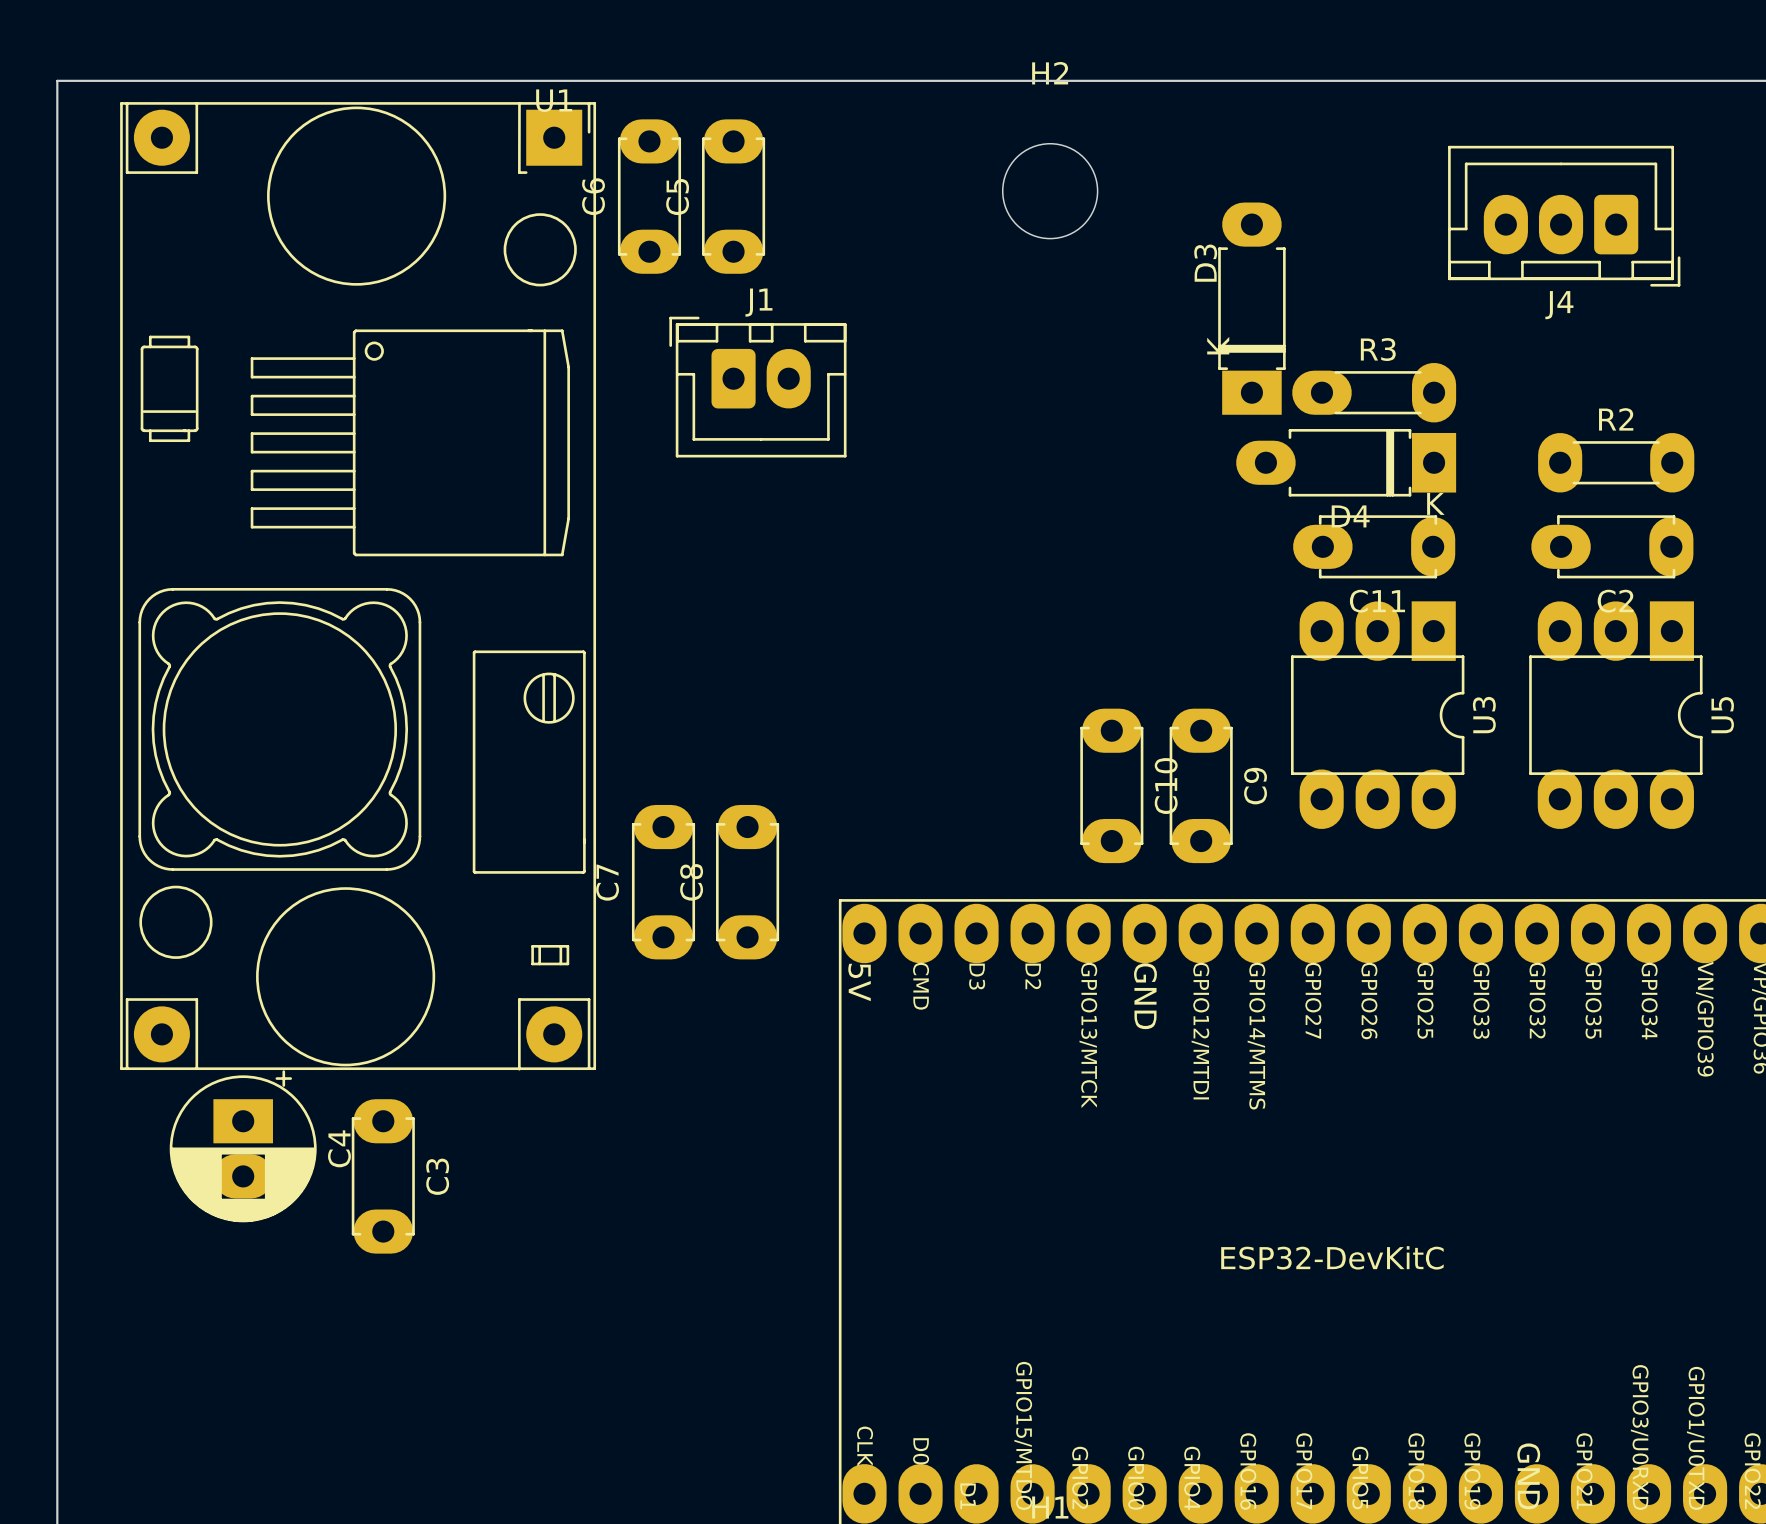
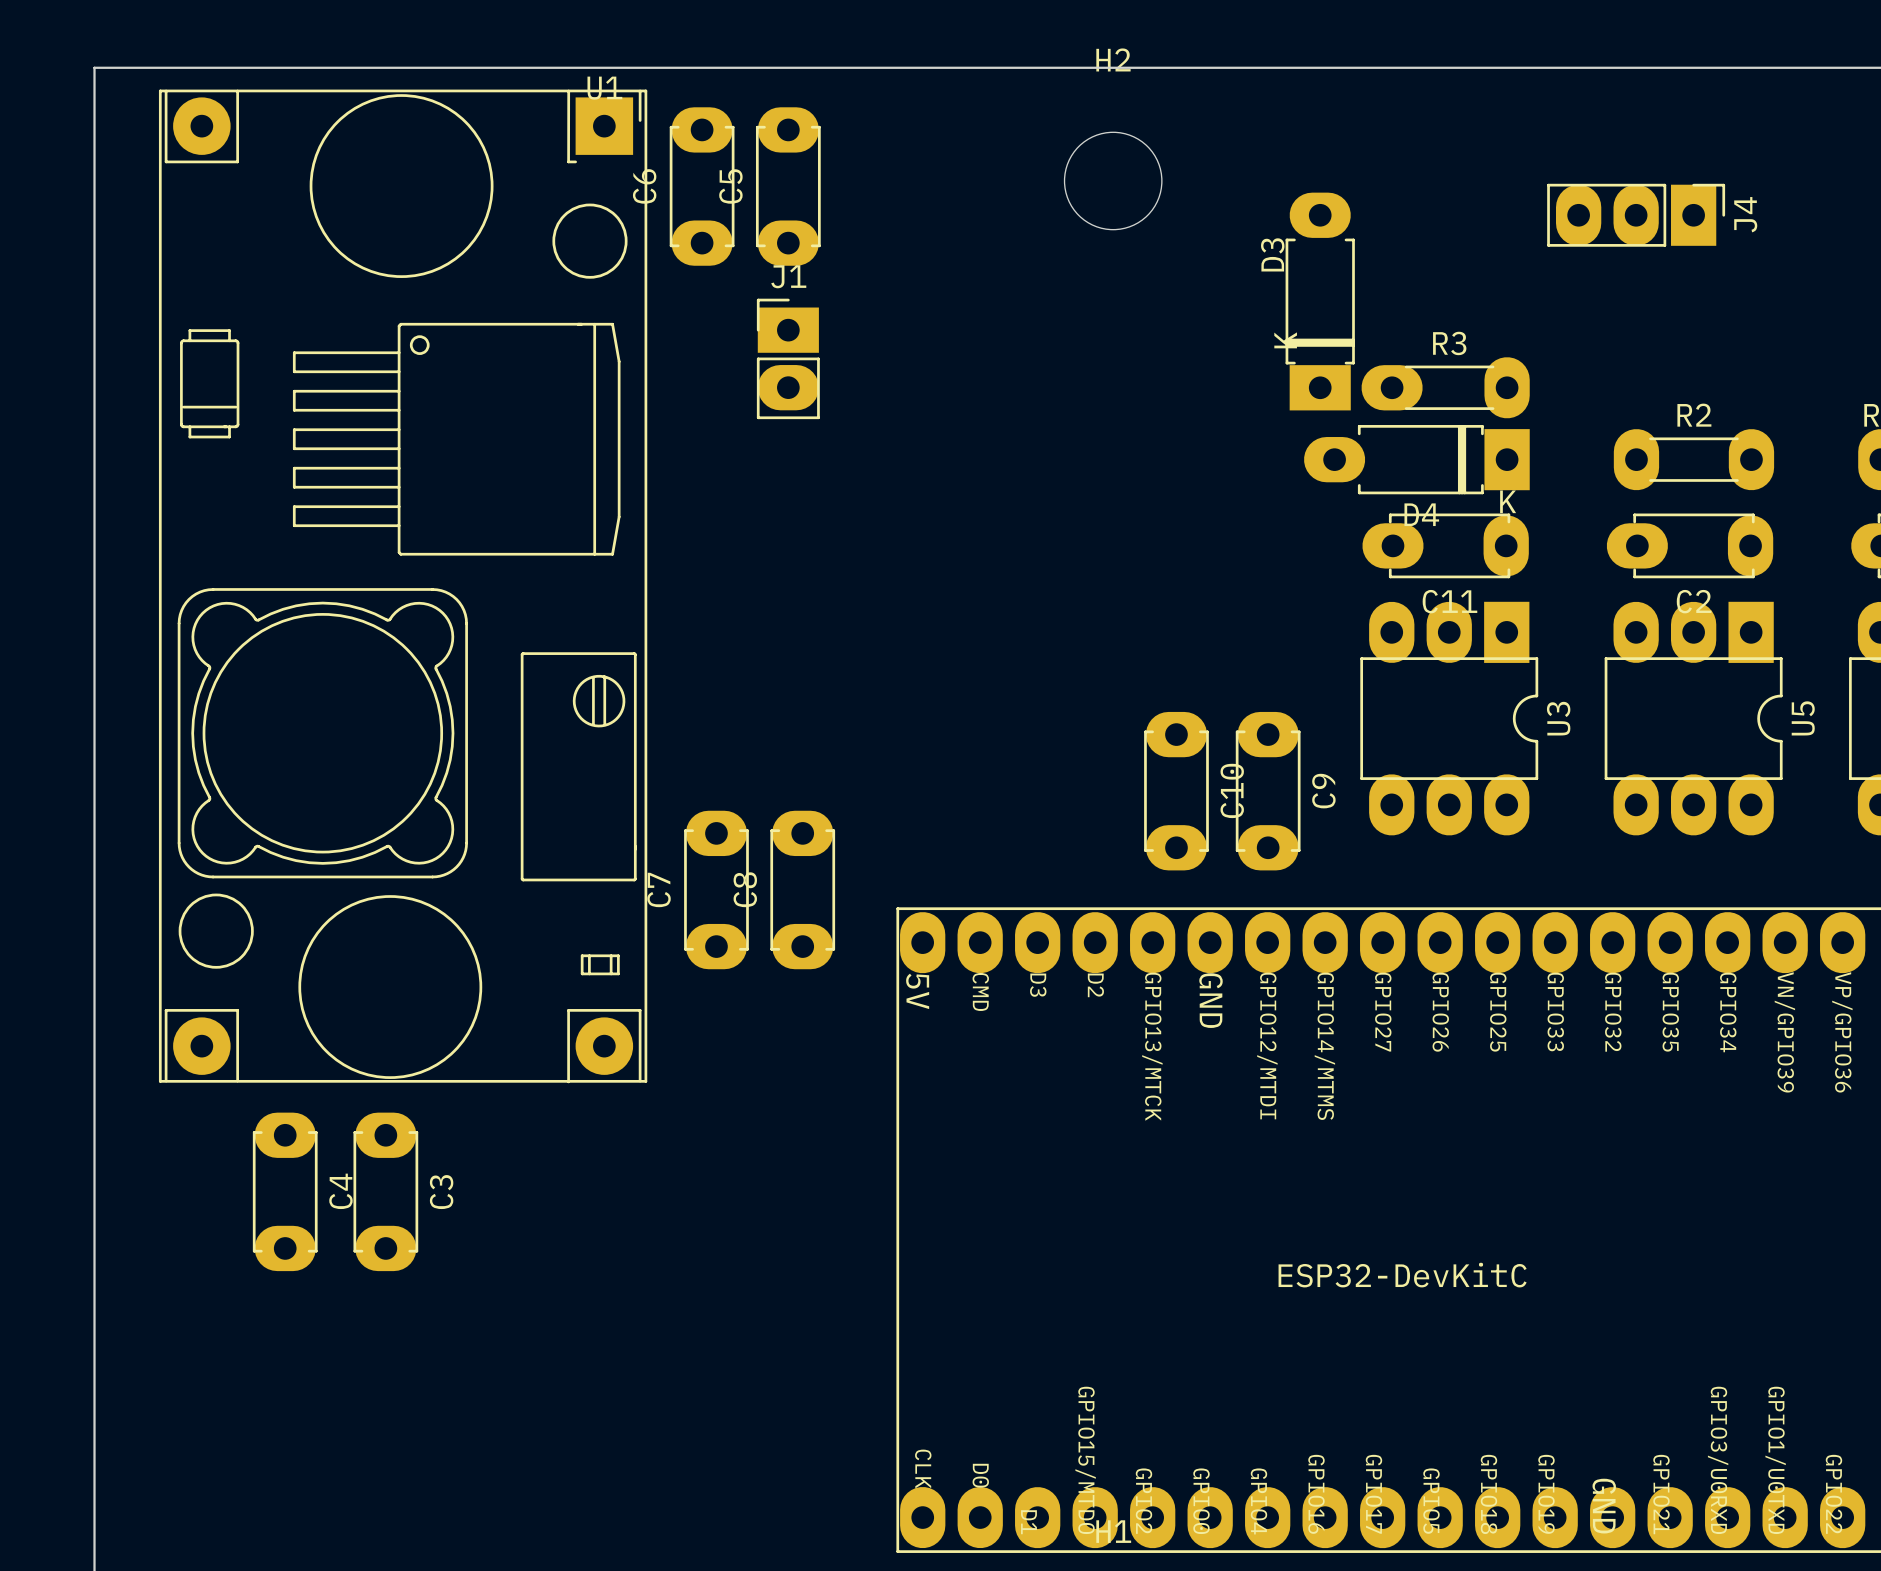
J4 footprint: [1448, 145, 1681, 287] -> [1547, 183, 1726, 247]
J4 name position: J4 (1559, 305) -> J4 (1745, 214)
J1 footprint: [669, 316, 847, 458] -> [756, 298, 820, 420]
C4 footprint: [169, 1070, 317, 1223] -> [252, 1112, 318, 1272]
C3 position: (383, 1176) -> (385, 1191)

